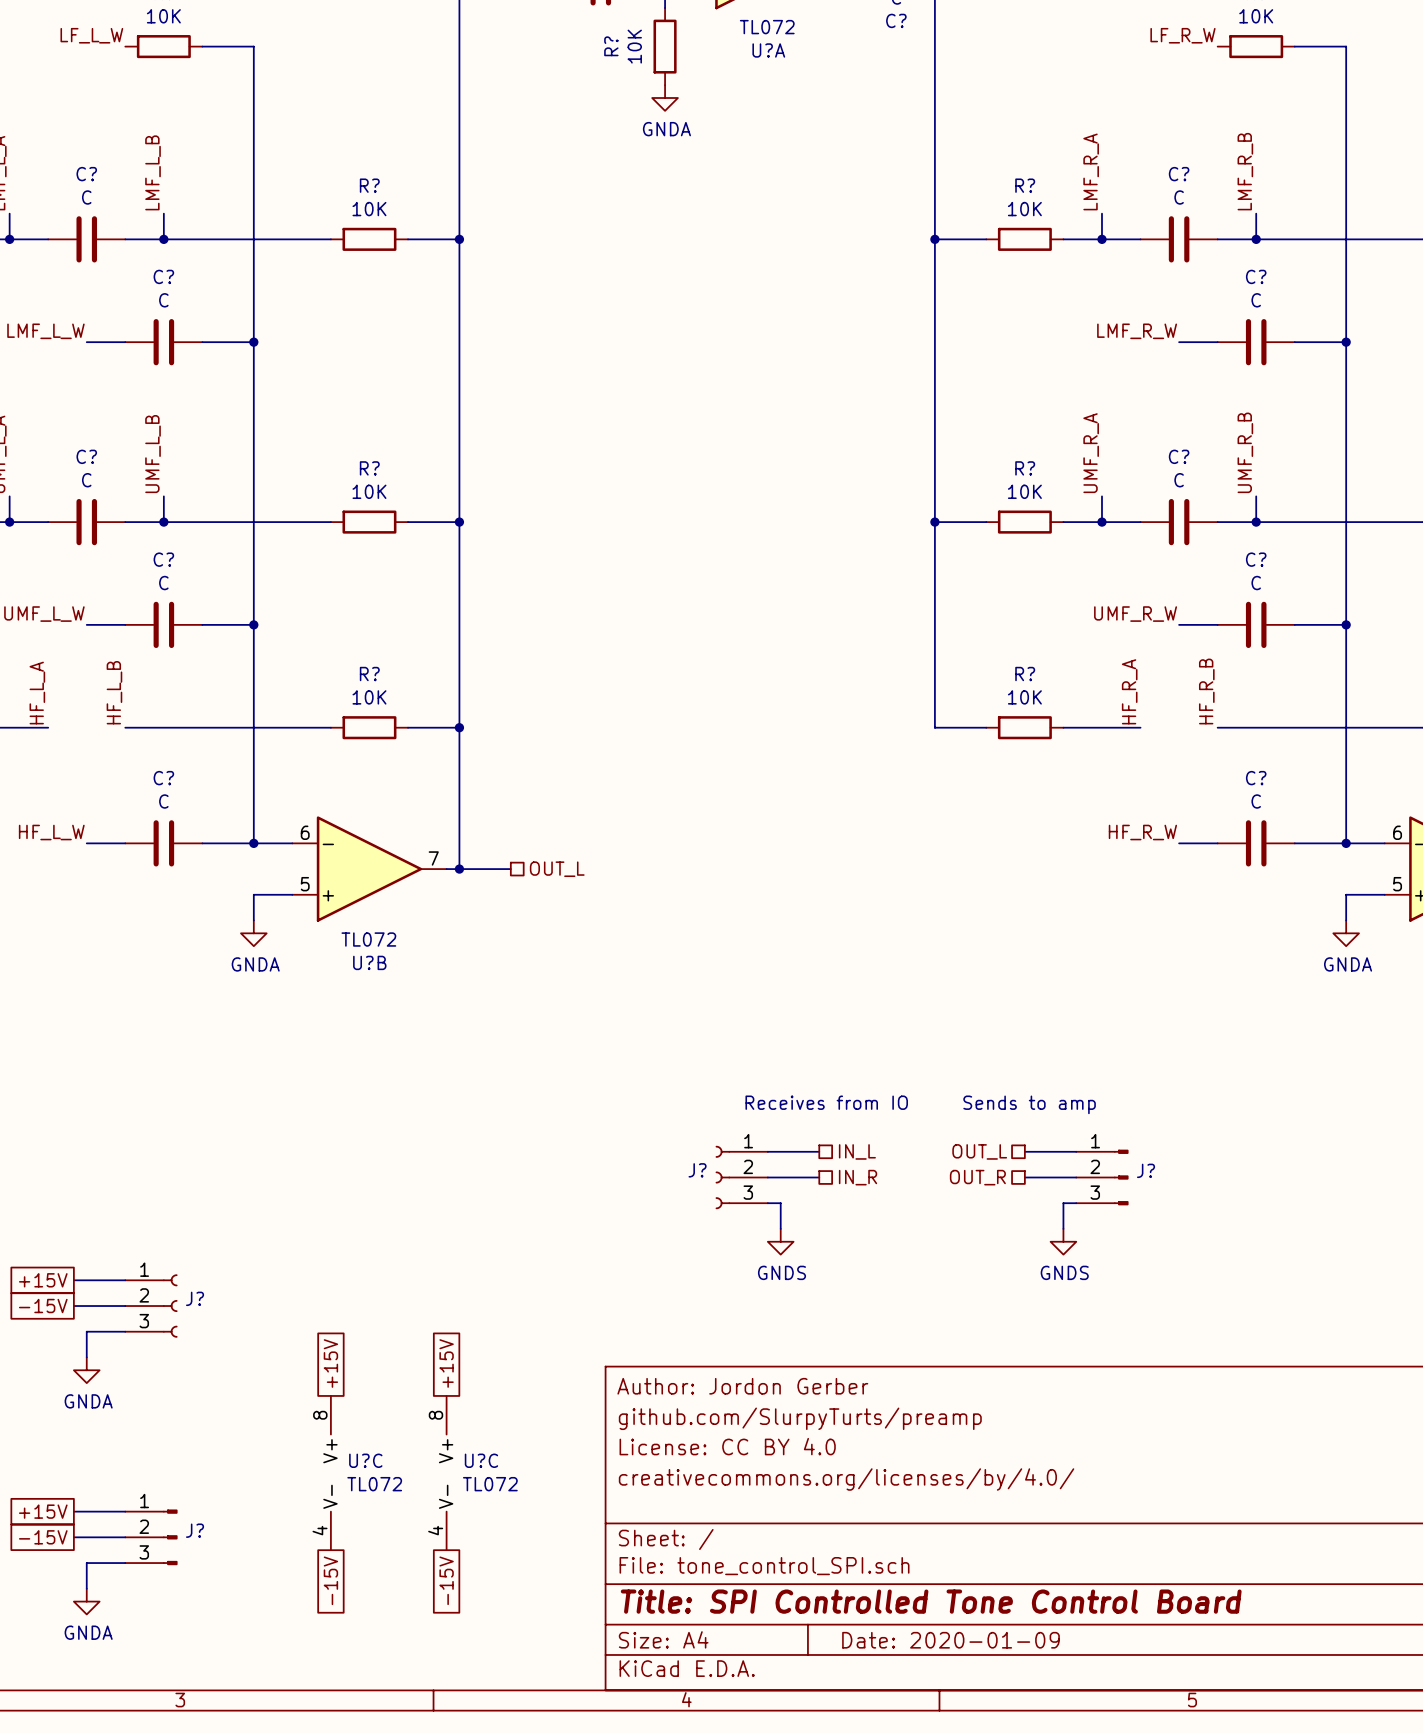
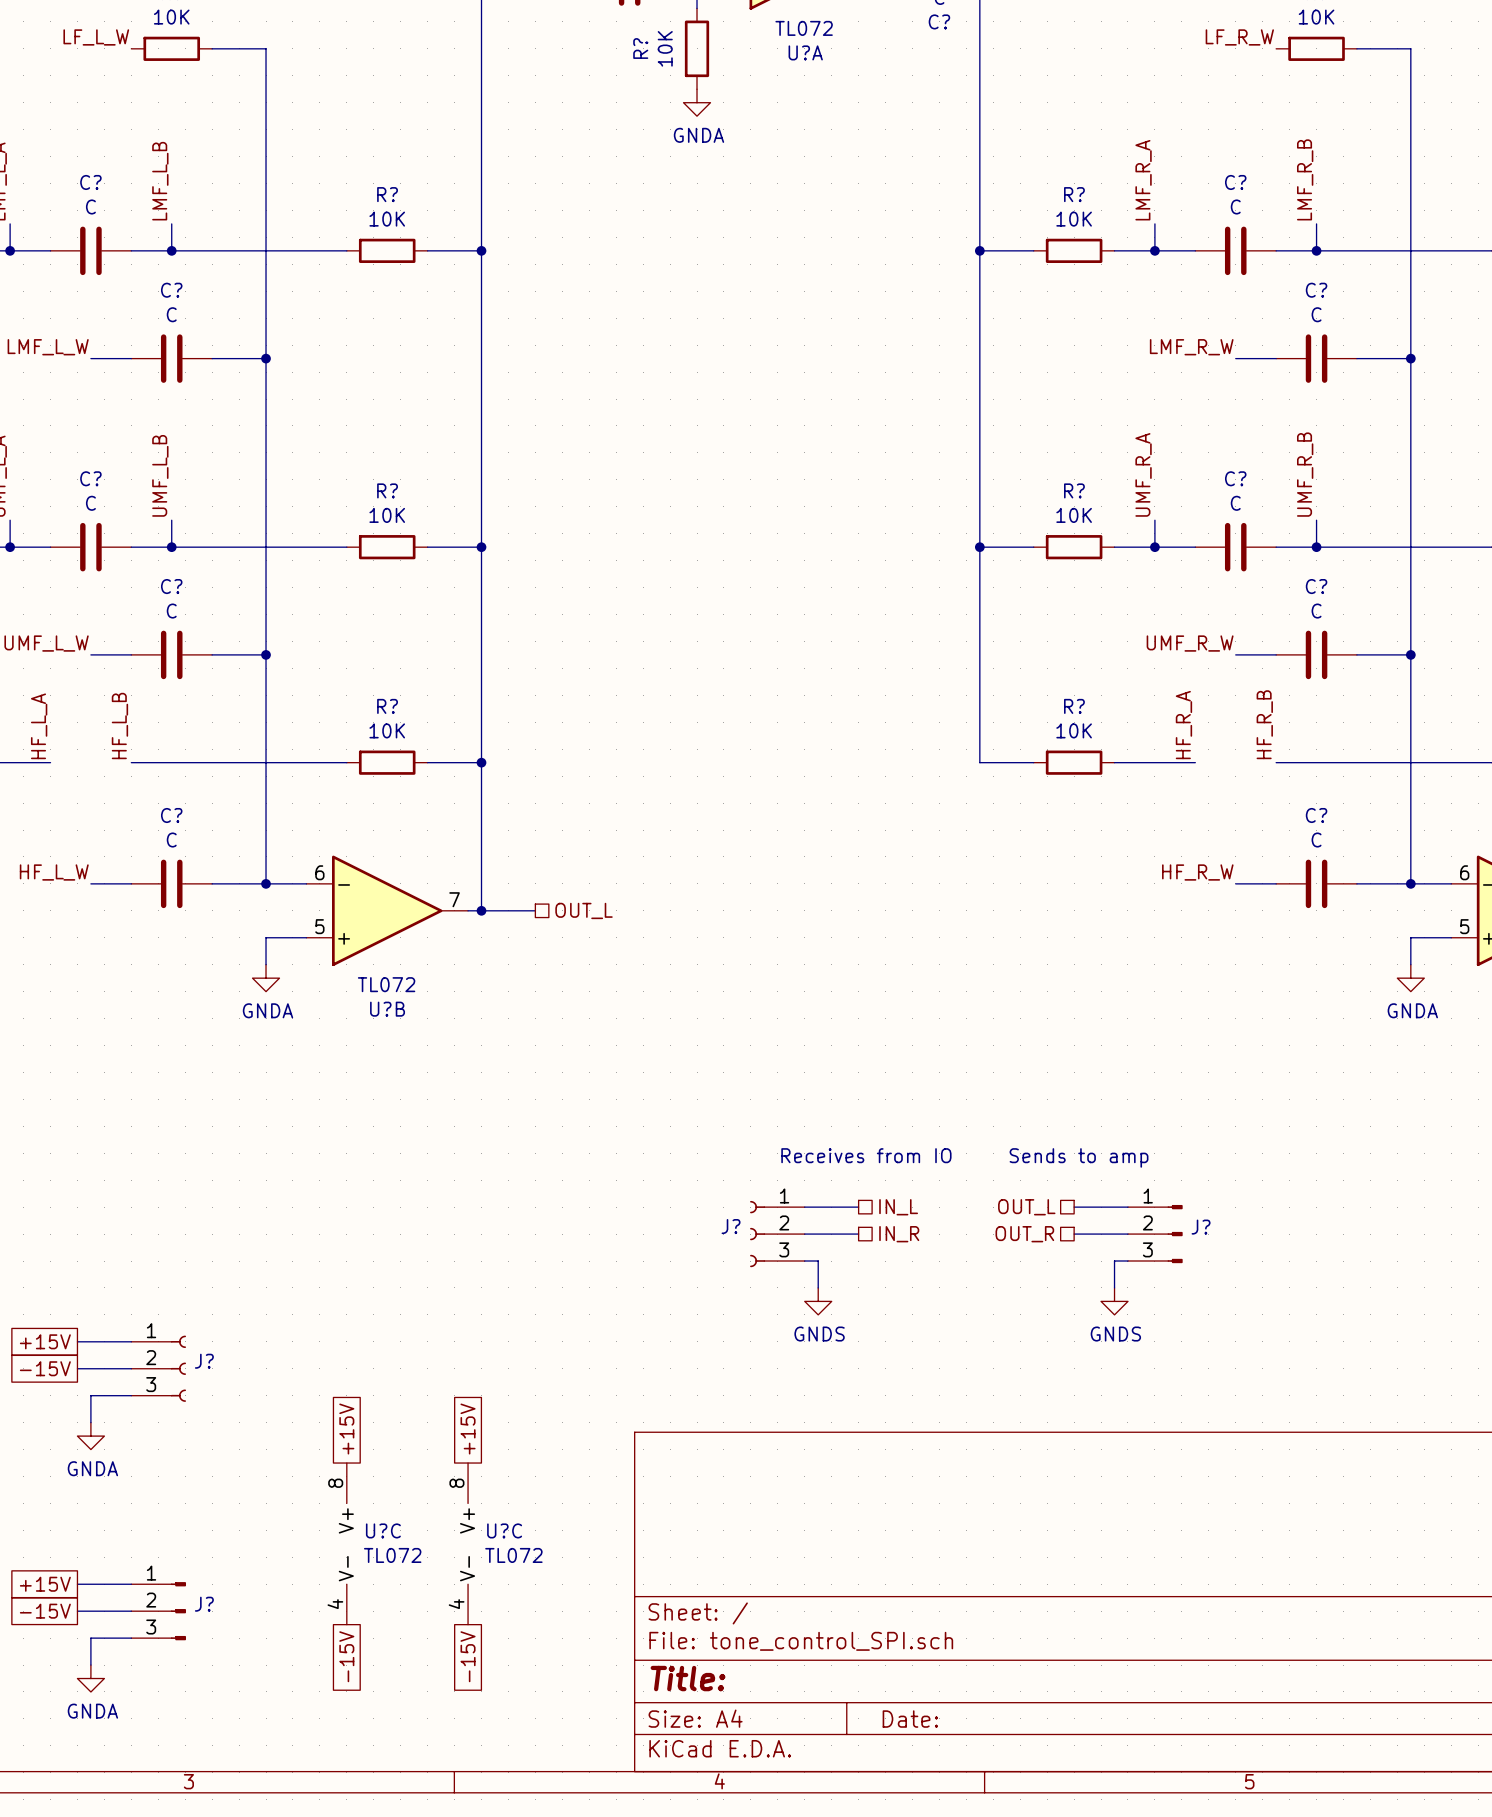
title block: Author: Jordon Gerber (742, 1386) -> none
title block: github.com/SlurpyTurts/preamp (800, 1418) -> none
title block: License: CC BY 4.0 (727, 1446) -> none
title block: creativecommons.org/licenses/by/4.0/ (846, 1479) -> none
title block: Title: SPI Controlled Tone Control Board (931, 1601) -> Title: (688, 1678)
title block: Date: 2020-01-09 (951, 1640) -> Date: (910, 1719)

